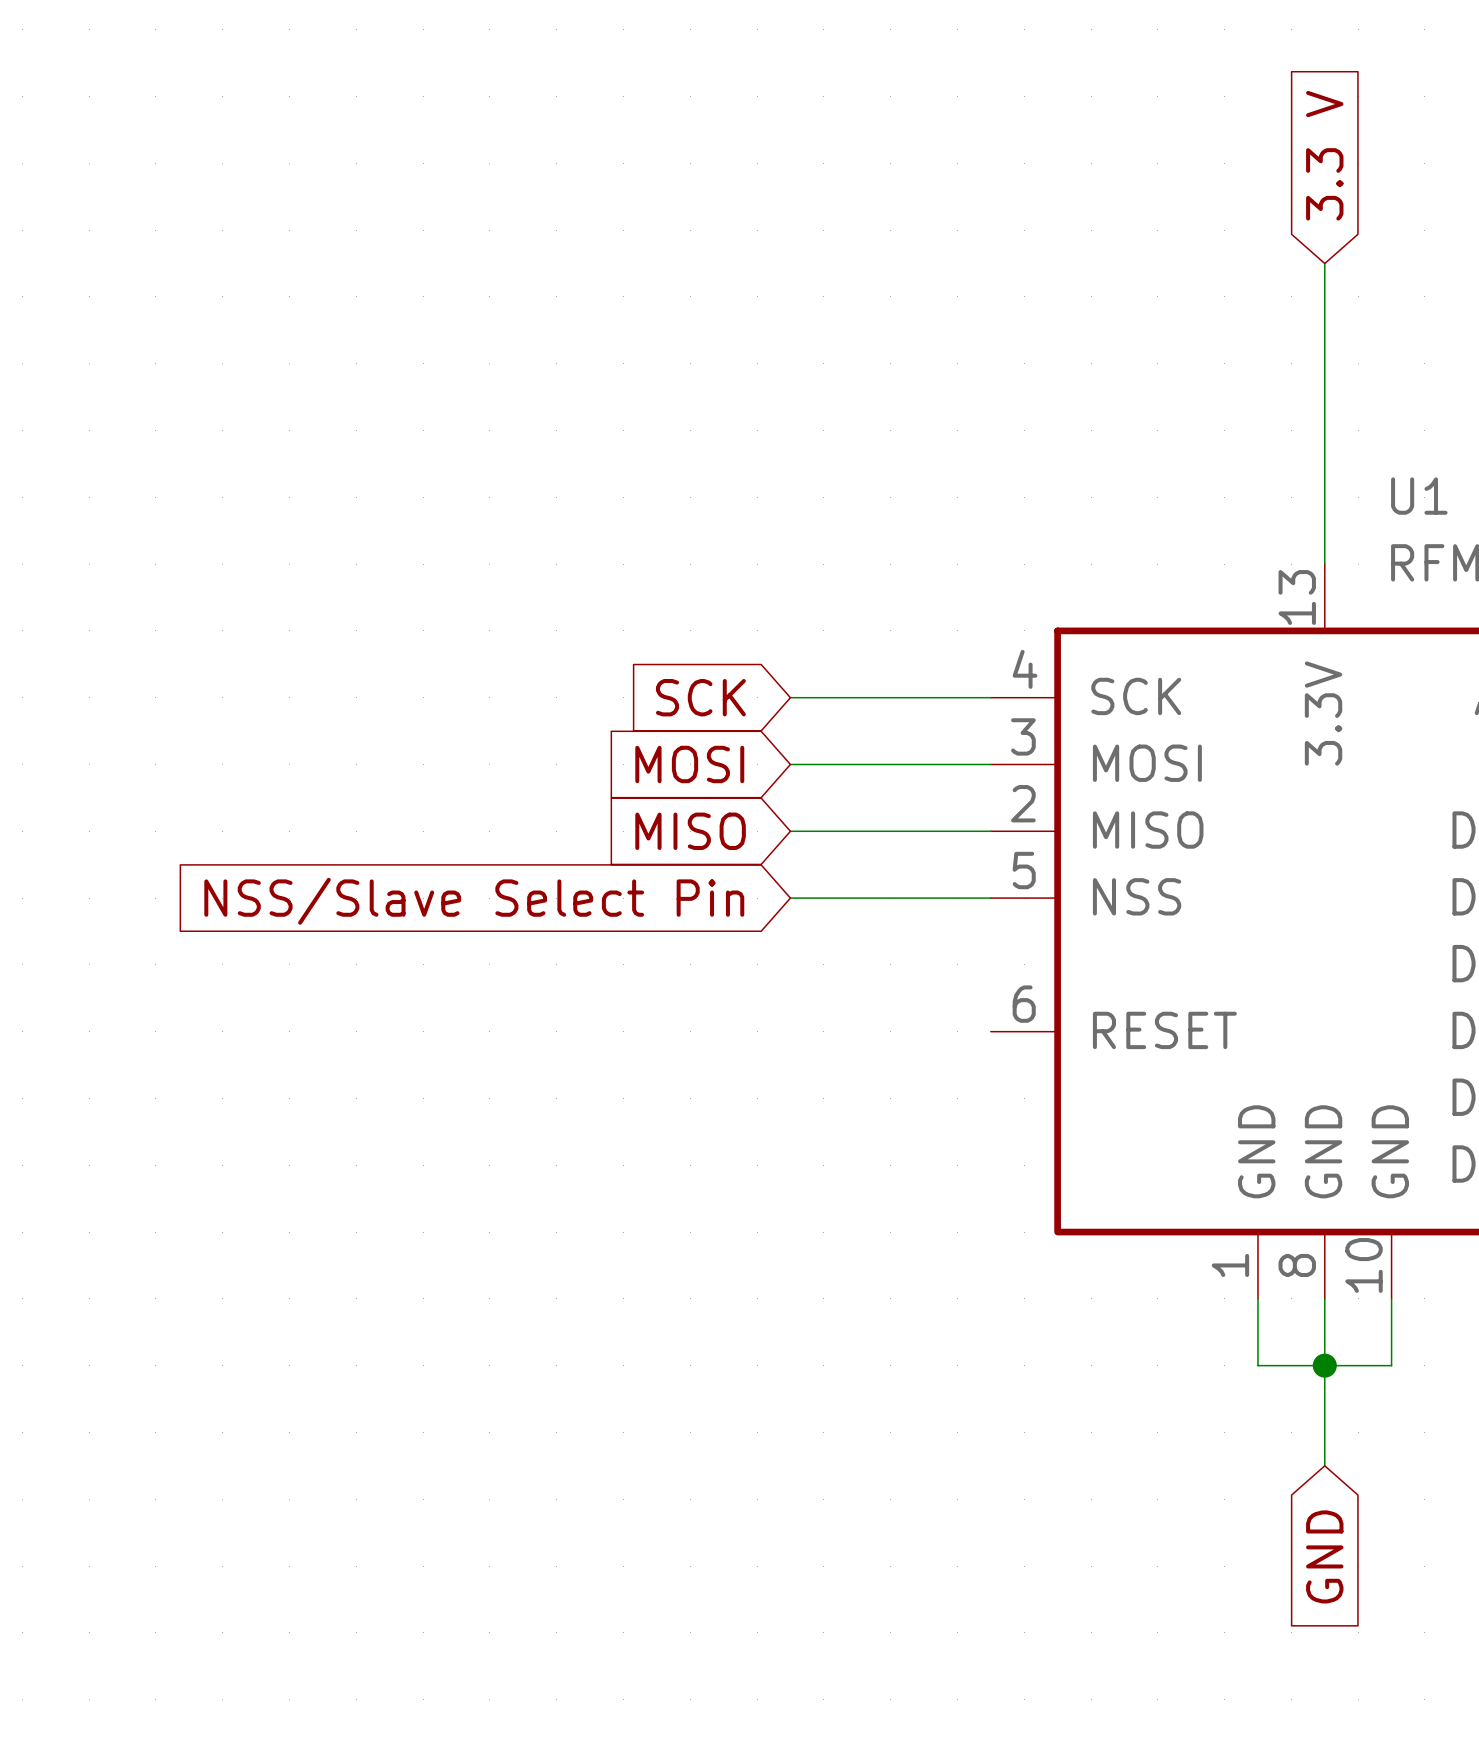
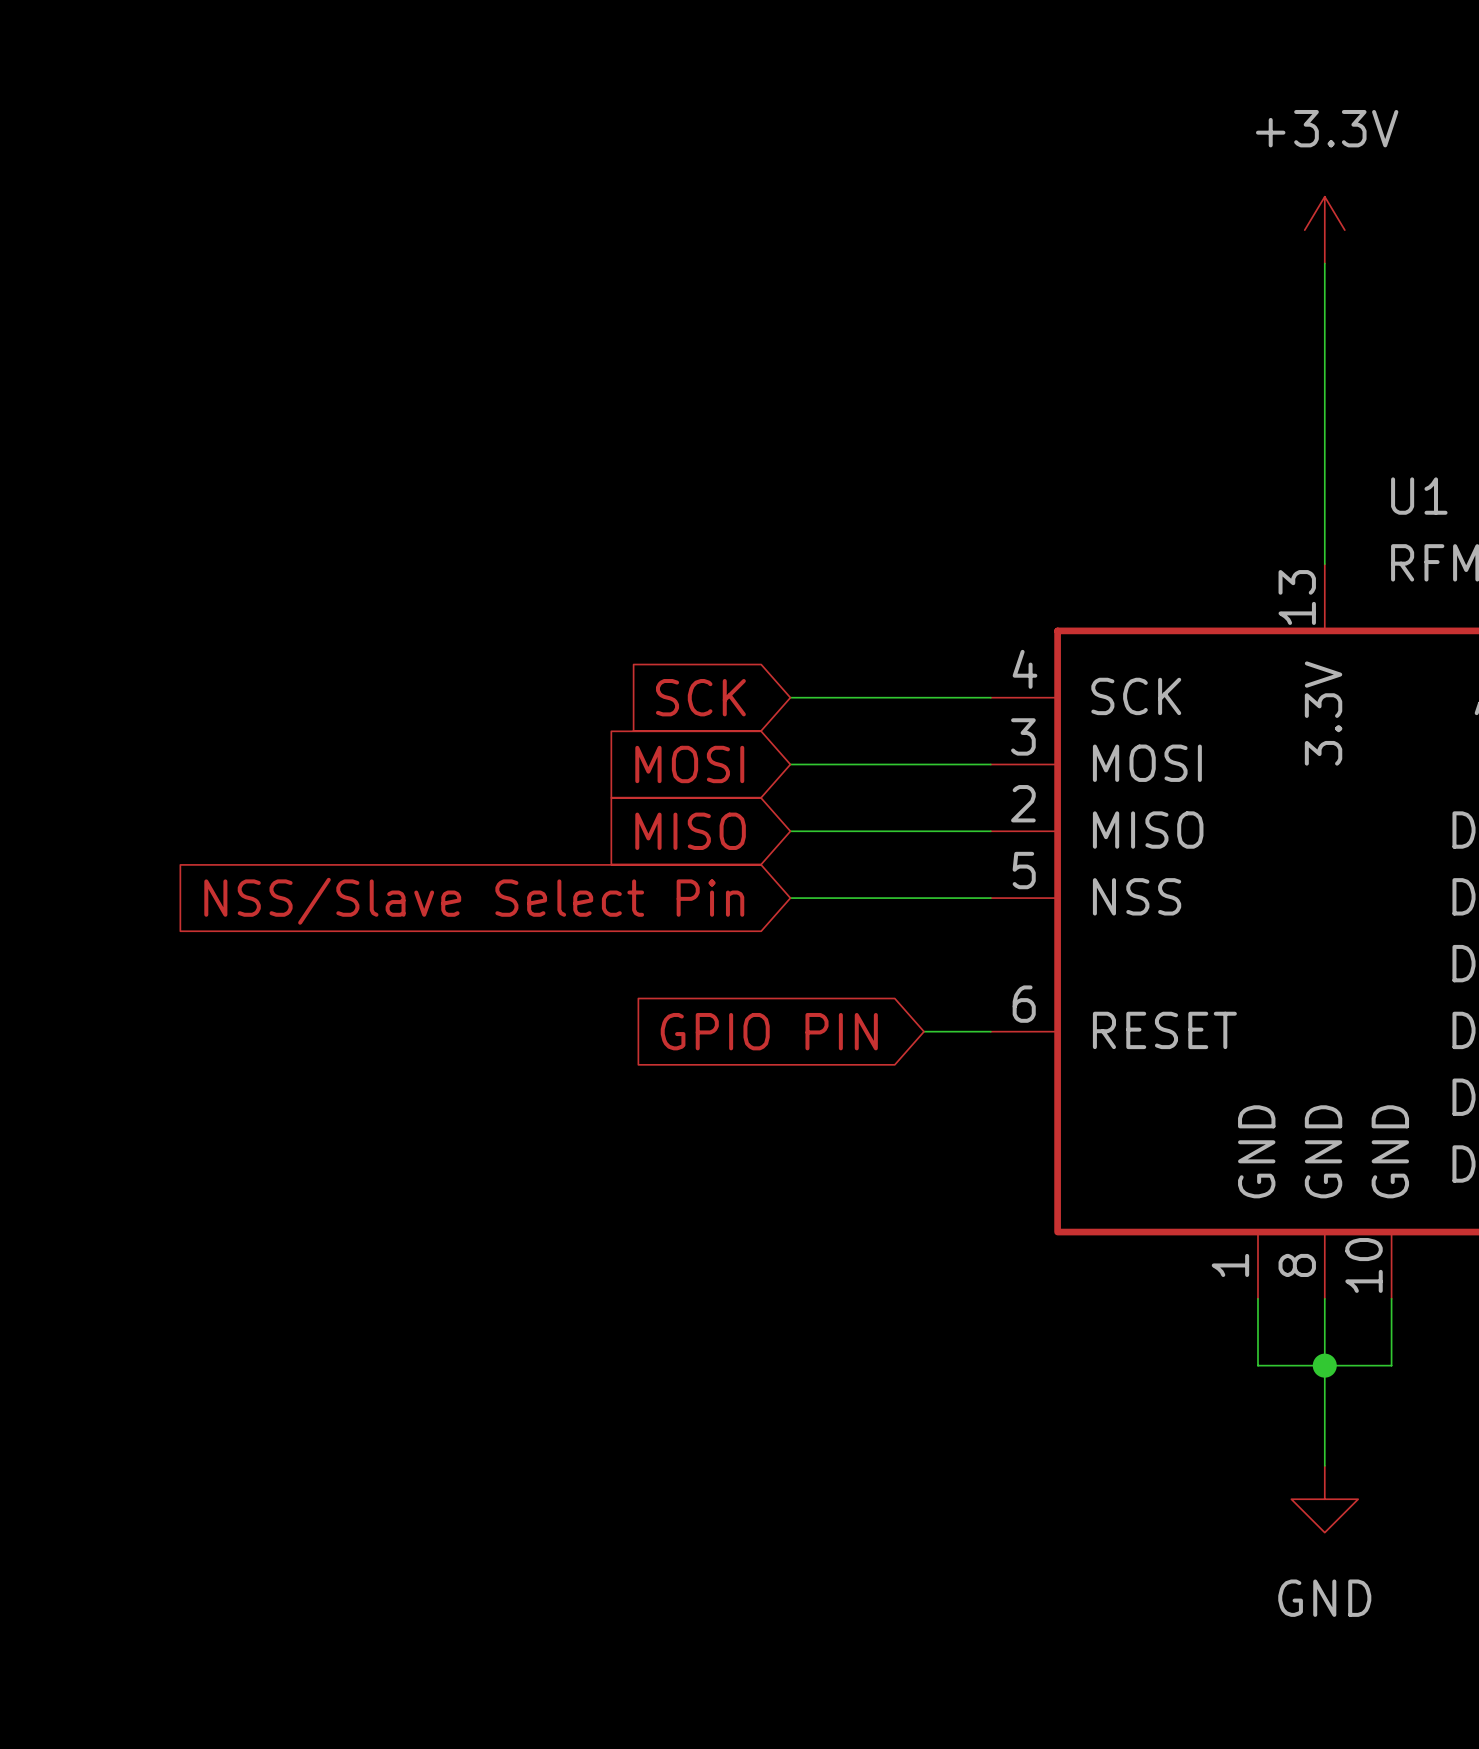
global label: 3.3 V (1324, 155) -> none
power symbol: none -> +3.3V (1324, 230)
global label: none -> GPIO PIN (769, 1031)
wire: none -> (924, 1031) (990, 1031)
power symbol: none -> GND (1324, 1499)
global label: GND (1324, 1556) -> none

